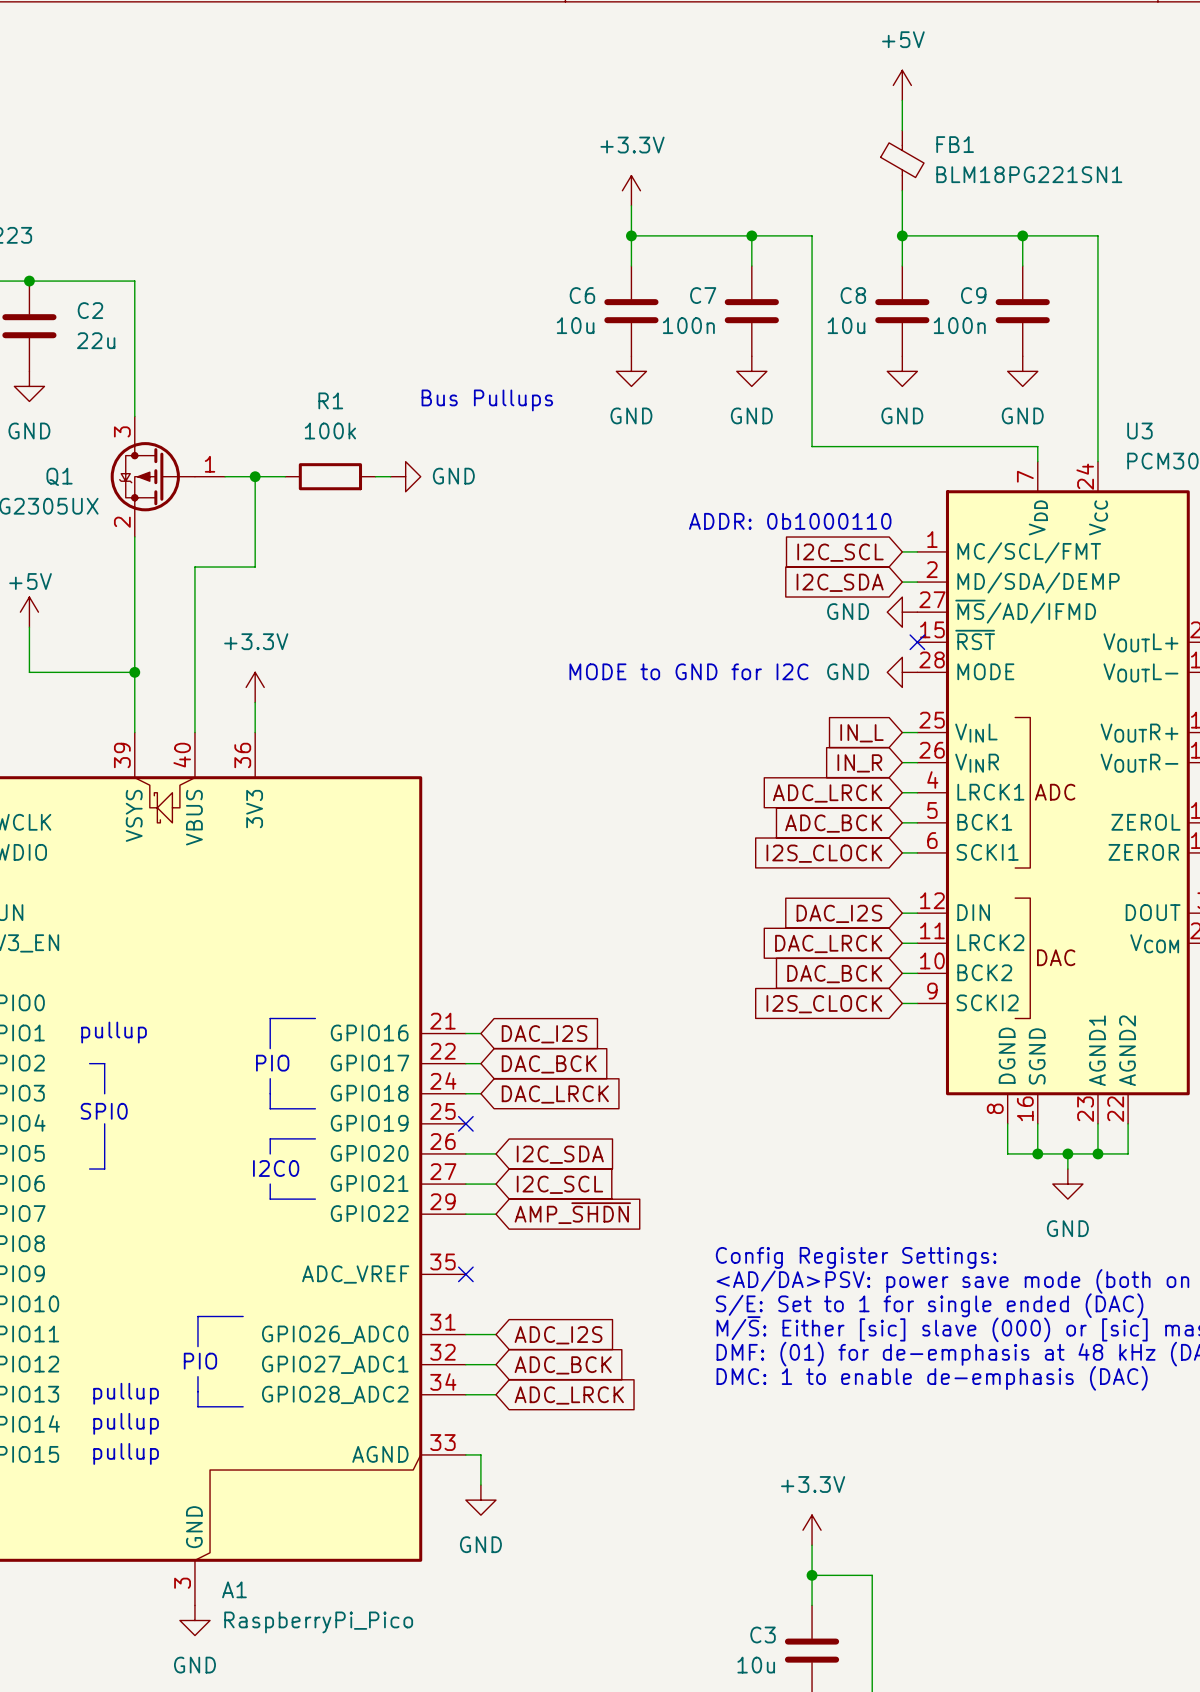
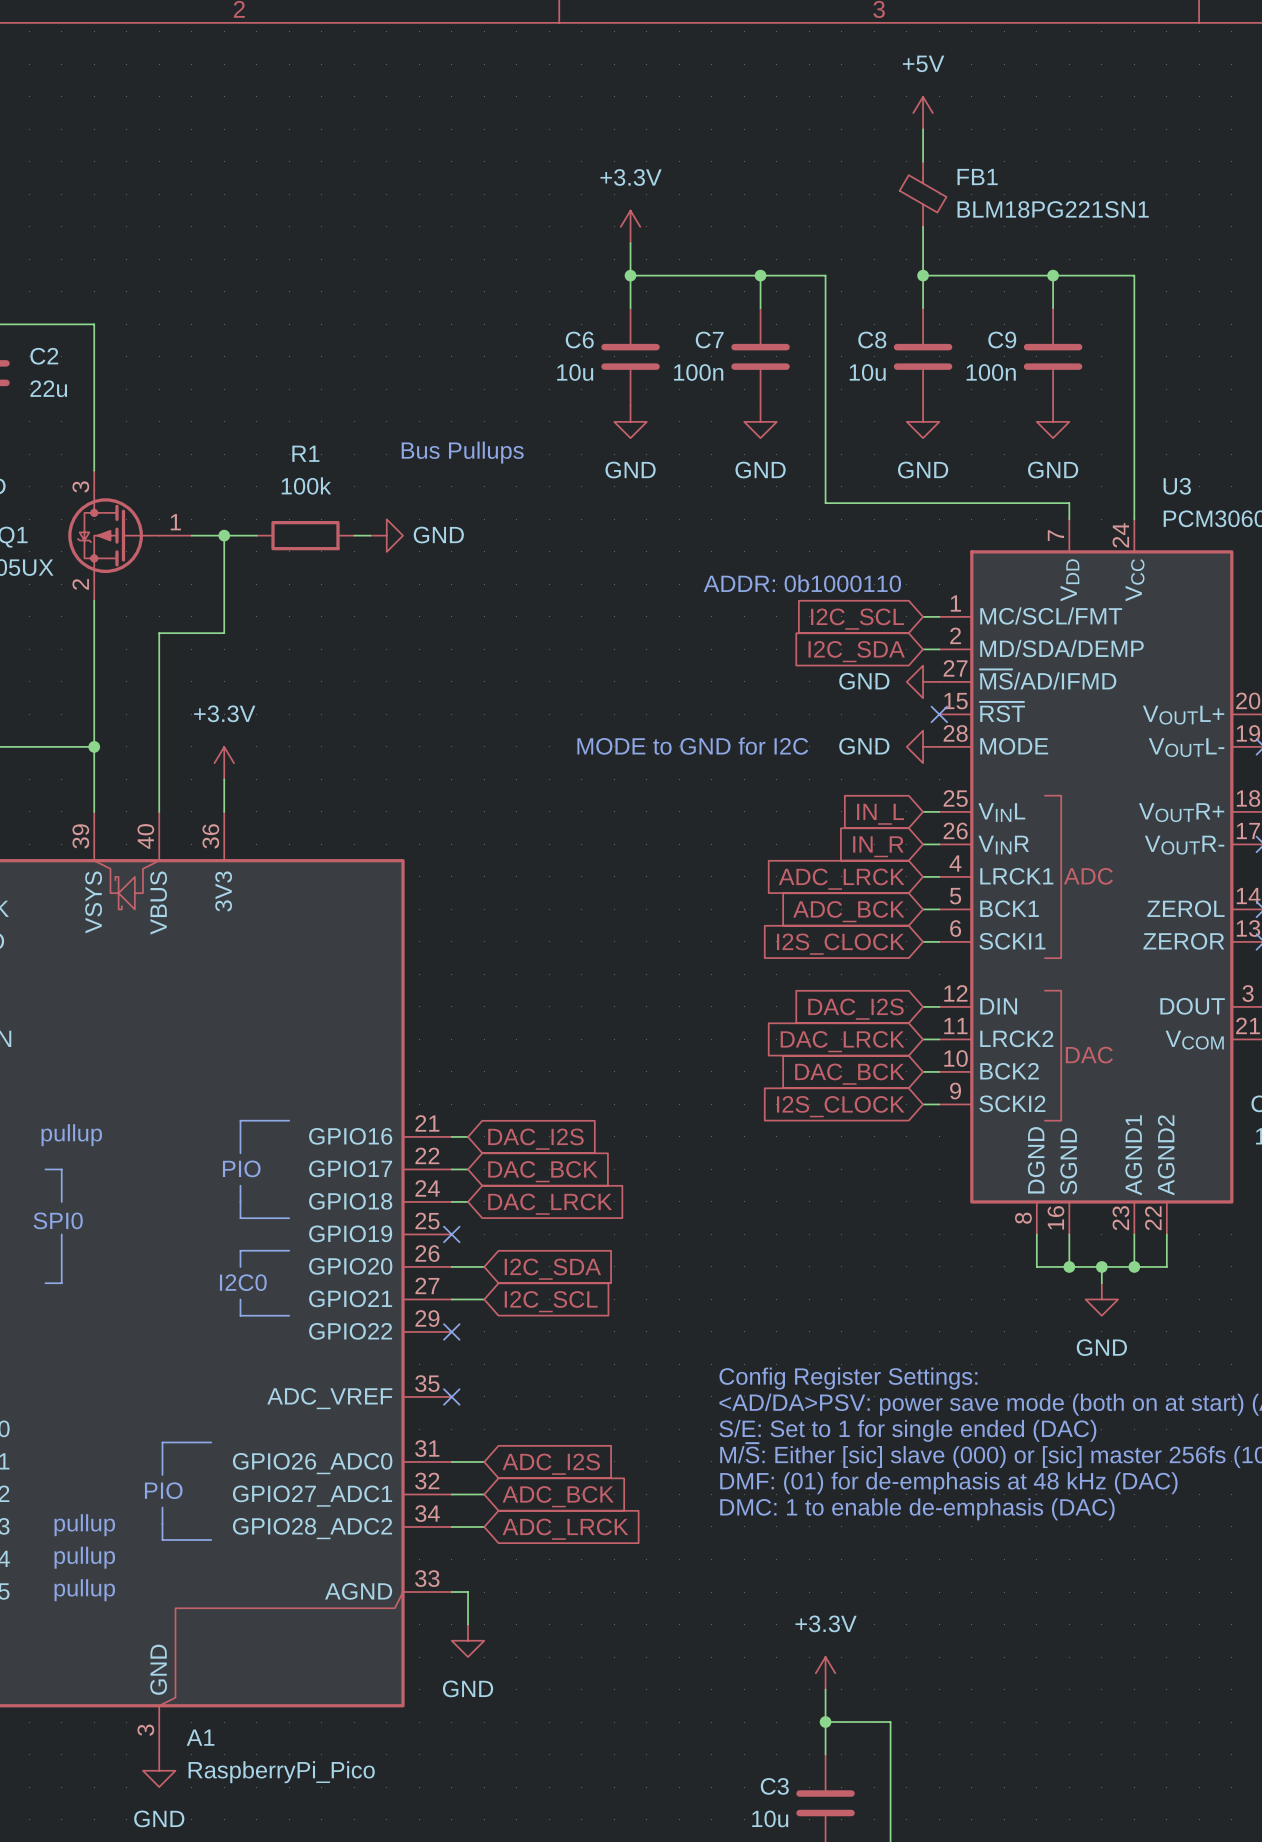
global label: AMP_~{SHDN} (572, 1213) -> none
wire: (465, 1214) (495, 1214) -> none
no-connect mark: none -> (451, 1331)

